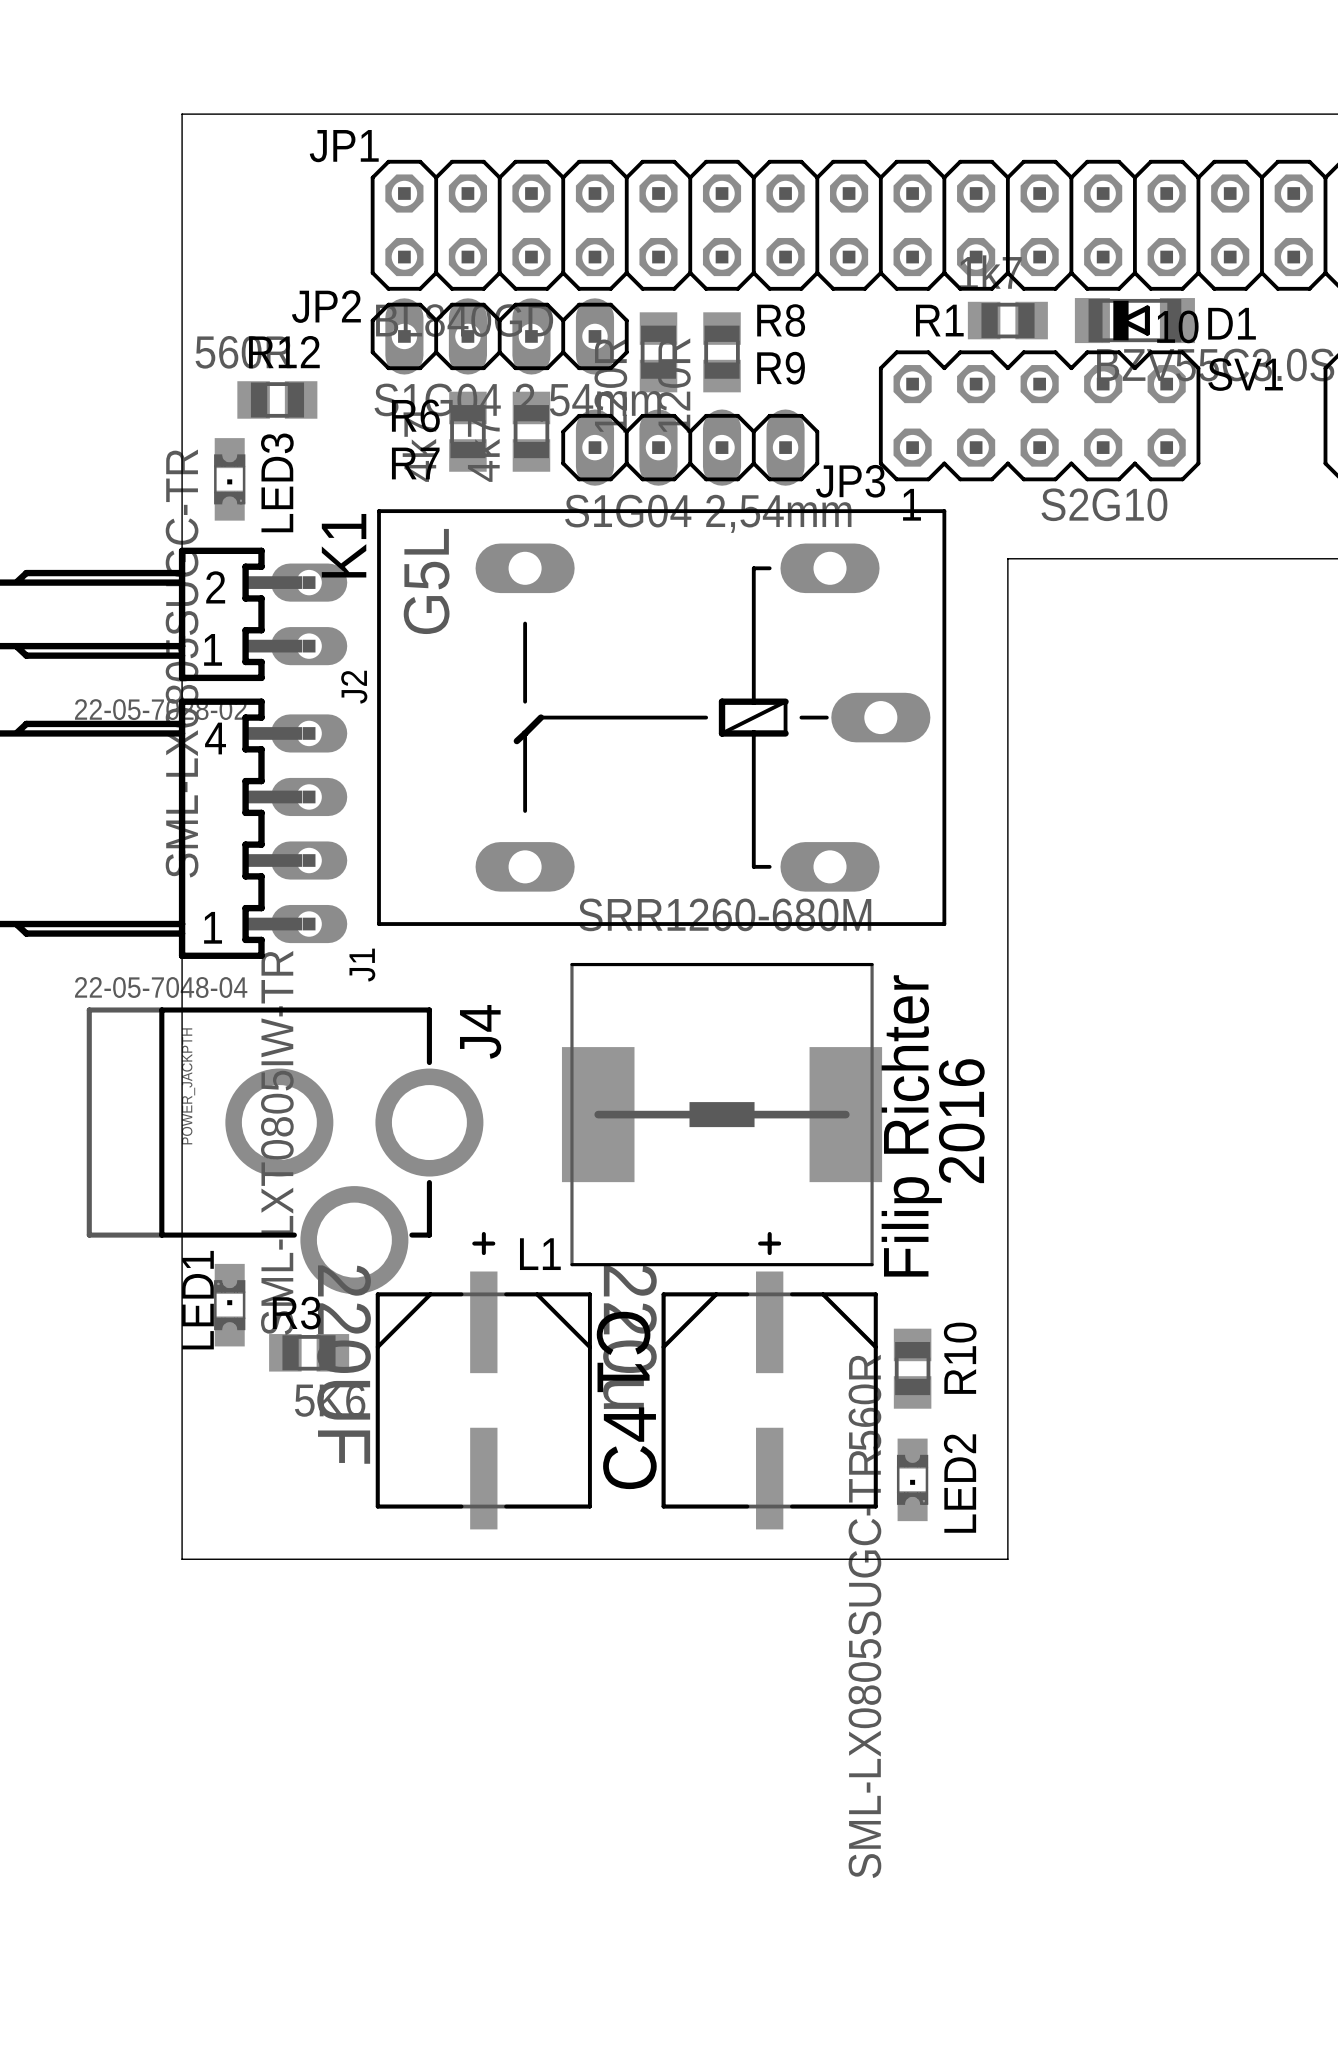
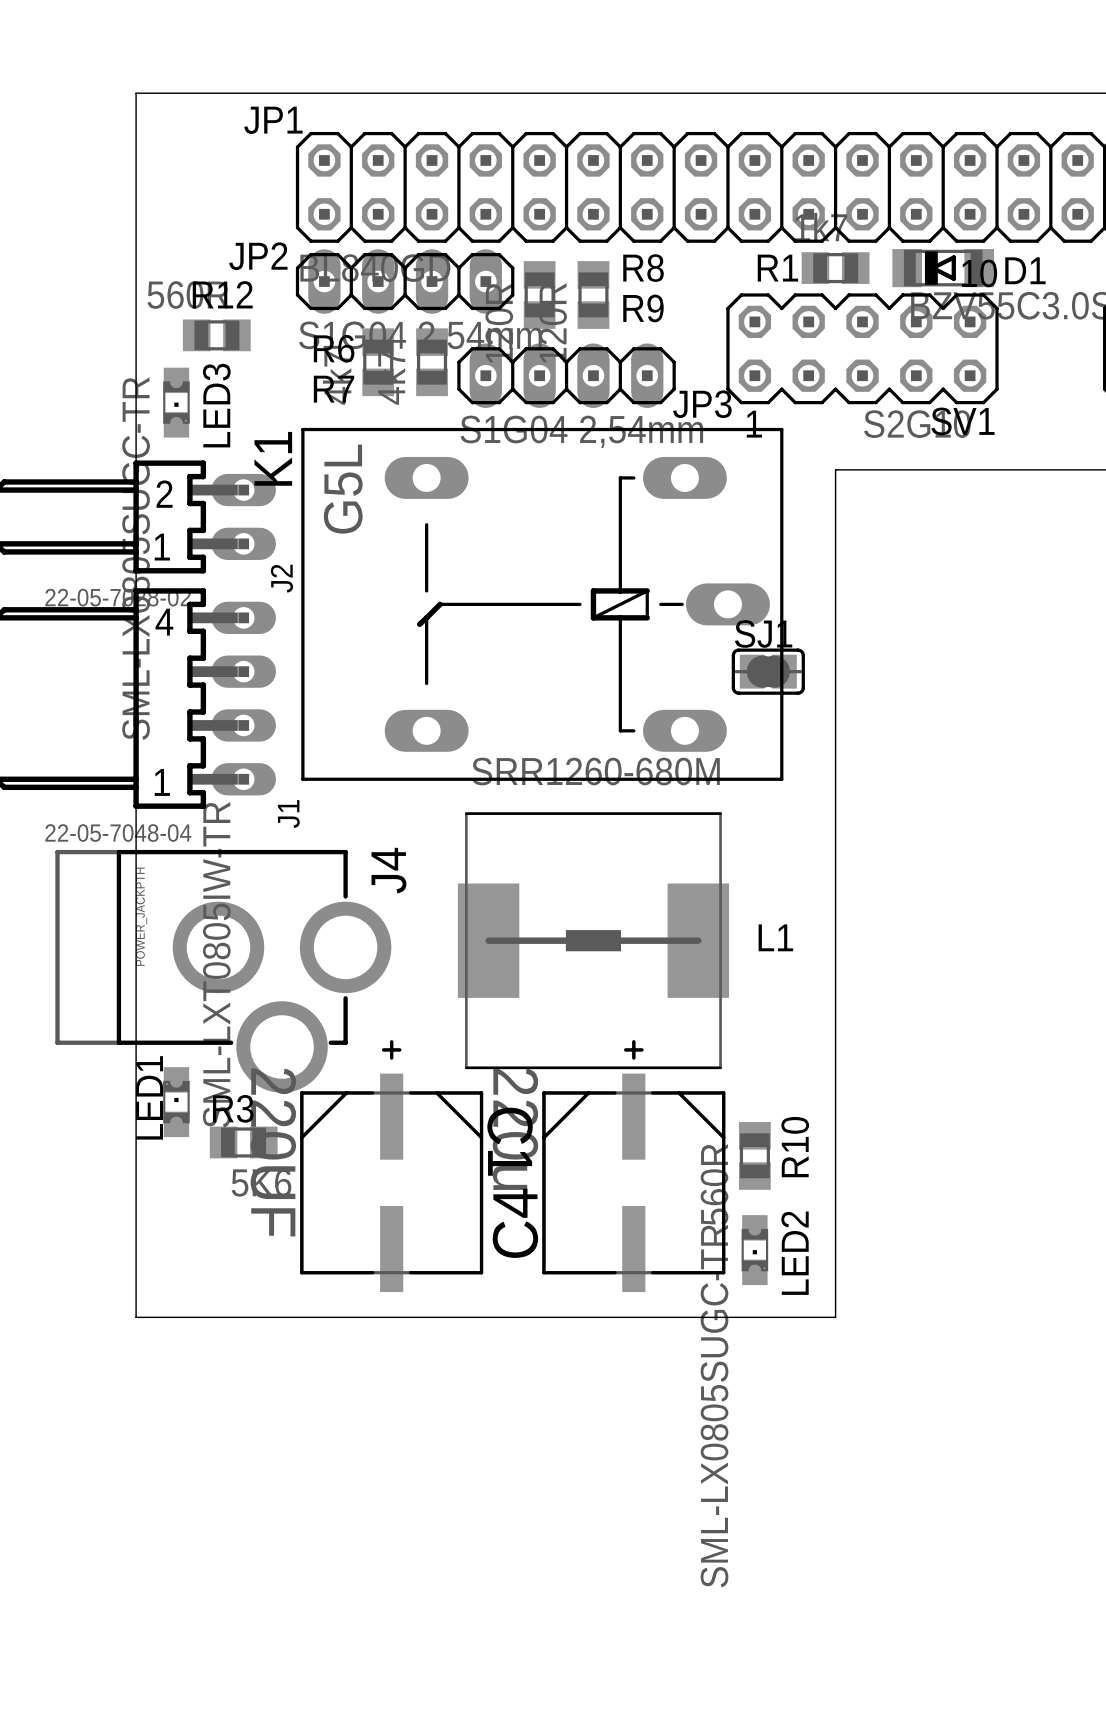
SV1 name position: SV1 (1245, 374) -> SV1 (962, 421)
SJ1: none -> (768, 671)
text: 2016 (961, 1121) -> none
text: Filip Richter (911, 1125) -> none
L1 name position: L1 (540, 1254) -> L1 (775, 937)

